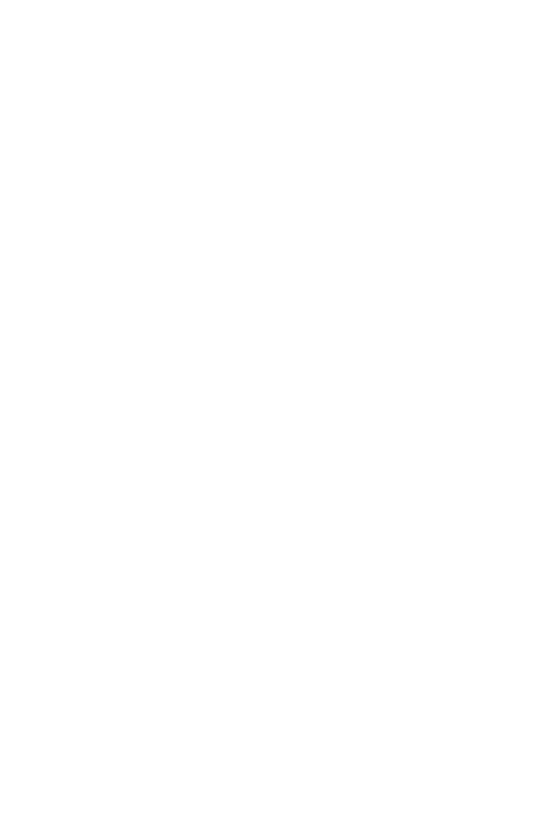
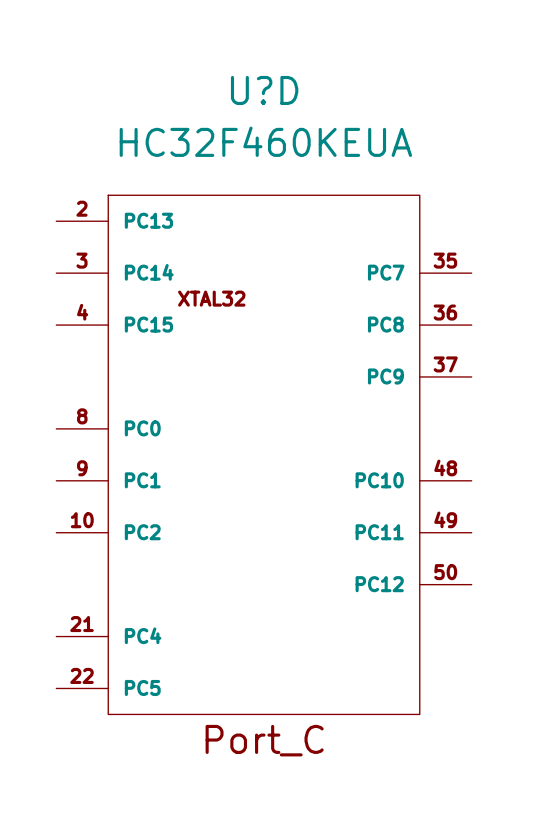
U?D: none -> HC32F460KEUA (264, 454)

